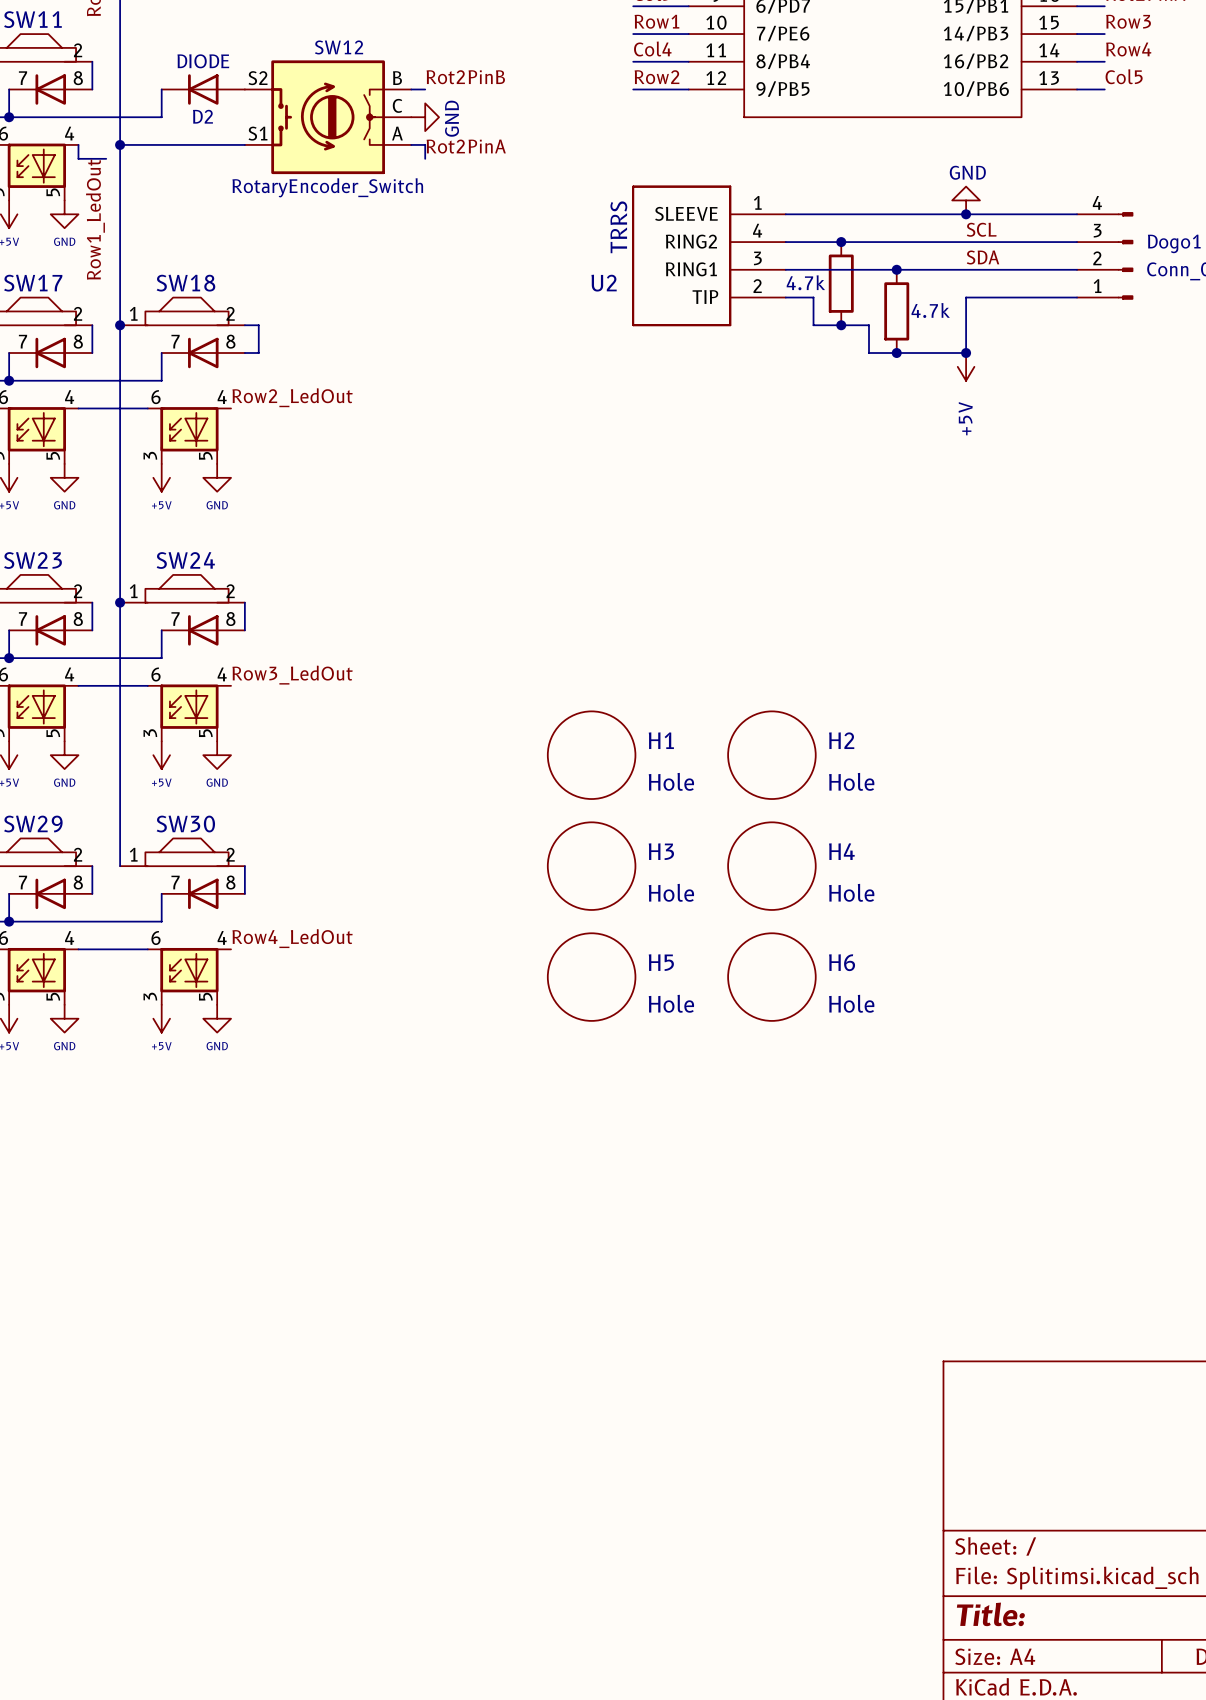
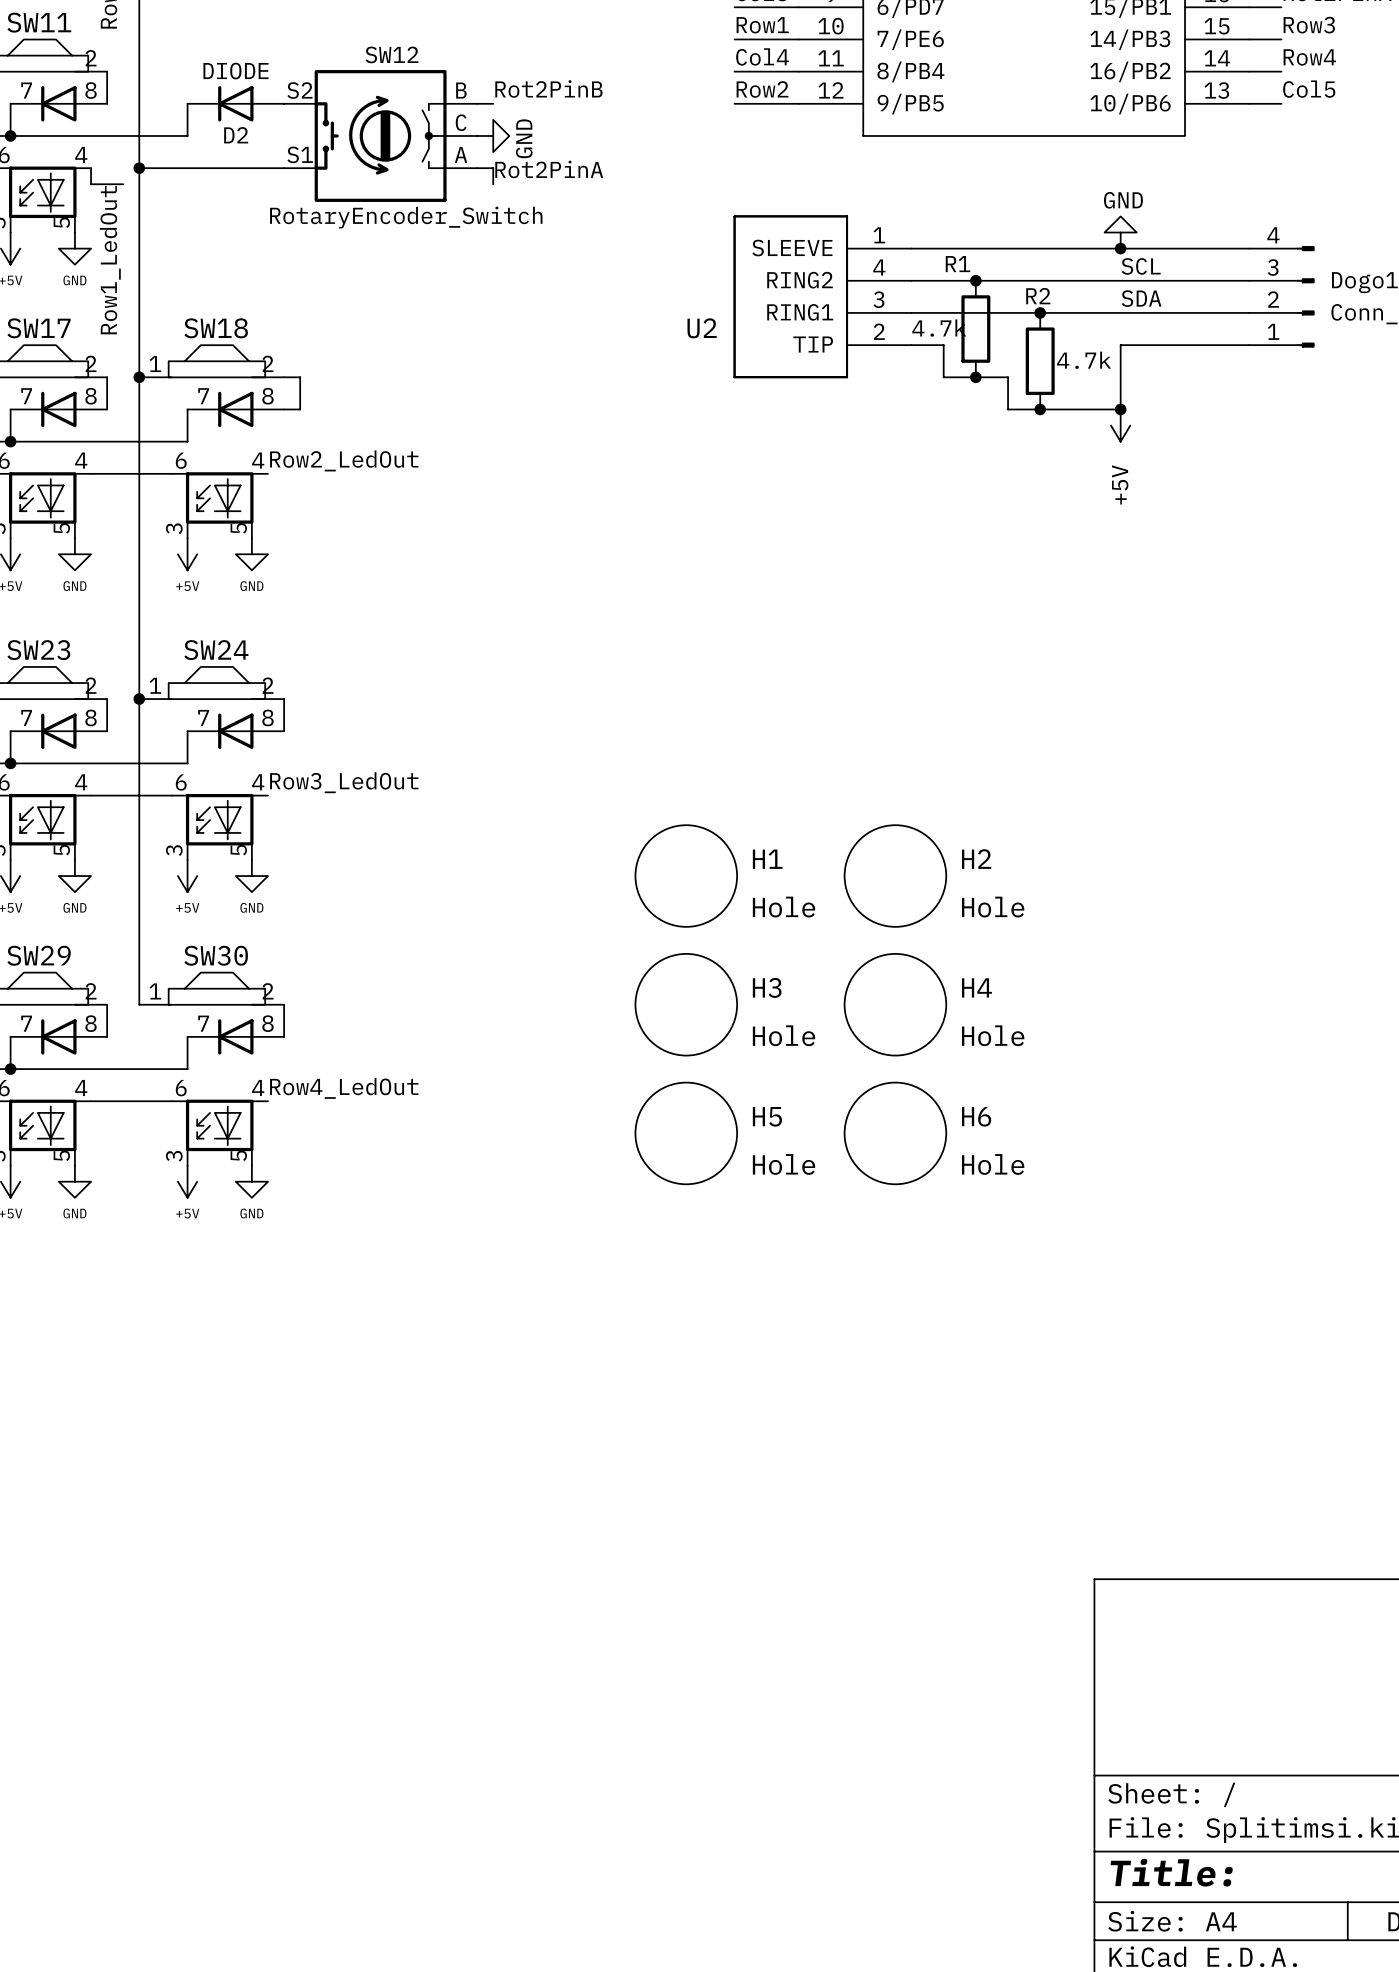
U2 value: TRRS (618, 227) -> none
R1 name: none -> R1 (958, 264)
R2 name: none -> R2 (1038, 296)

